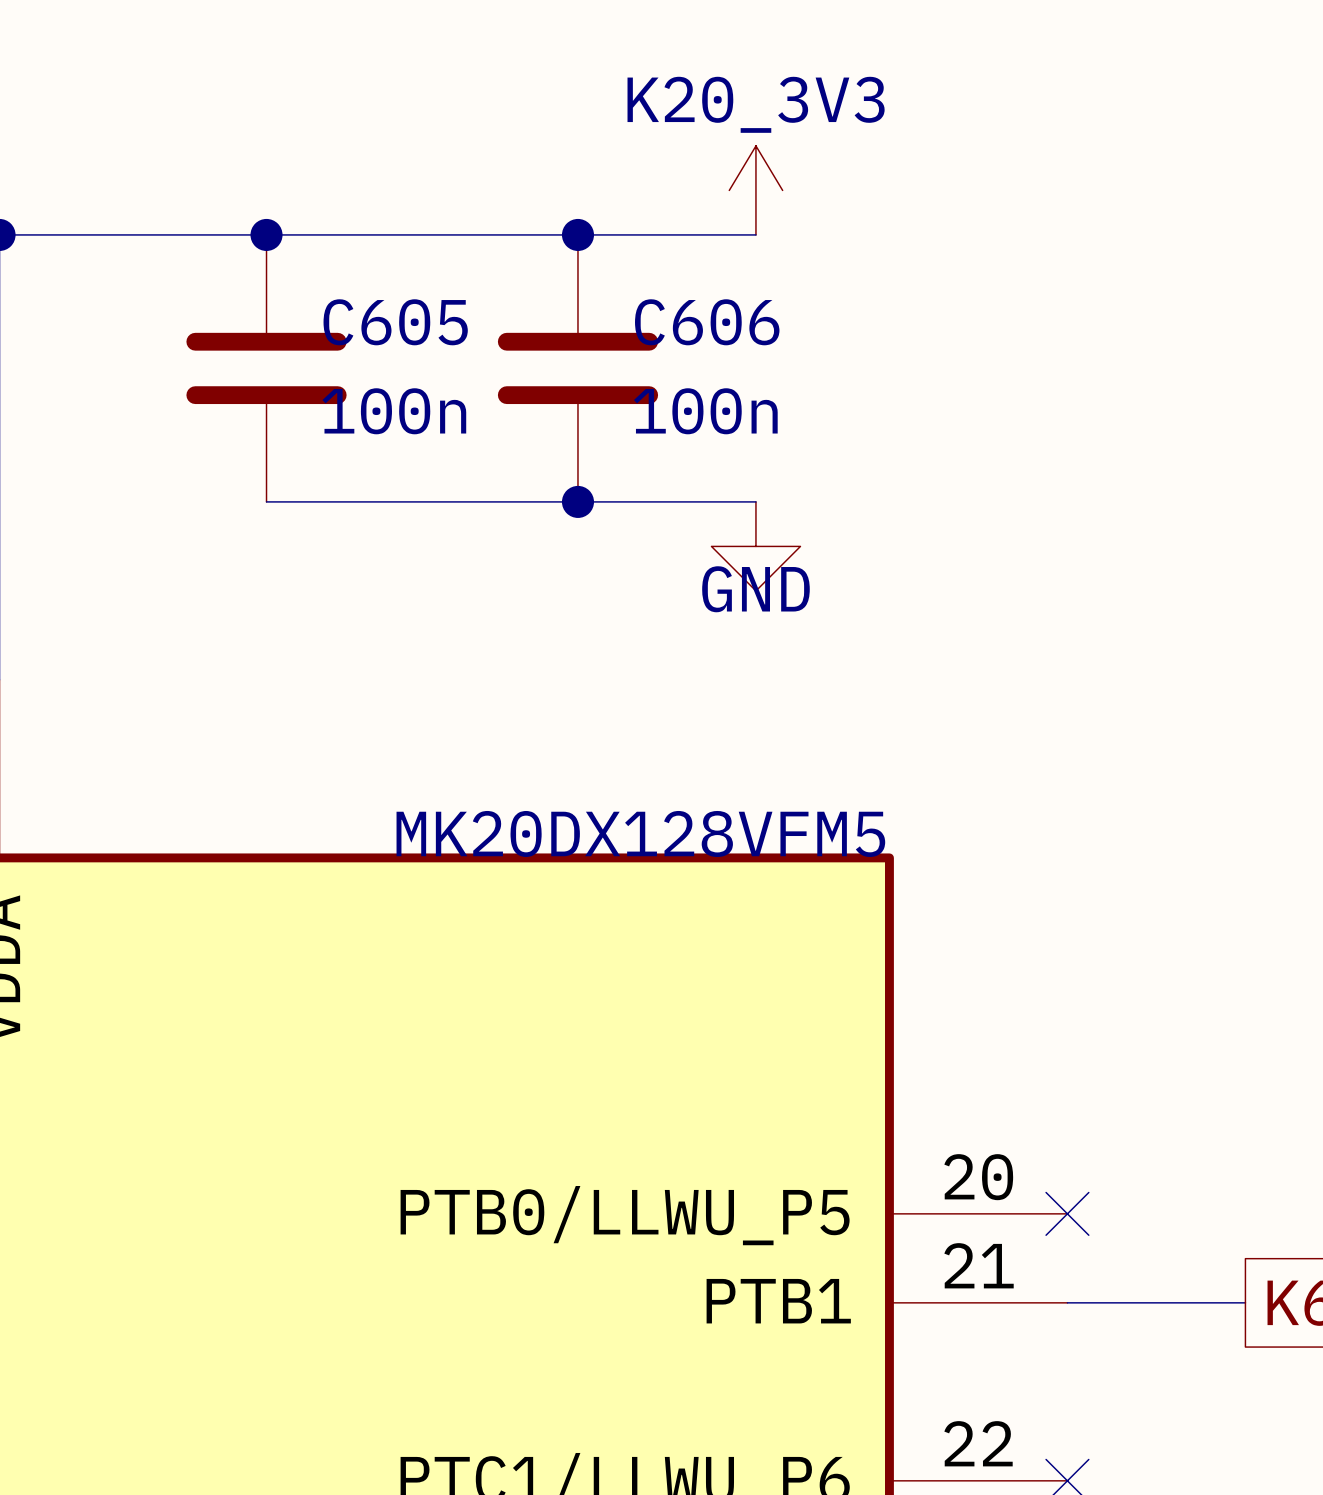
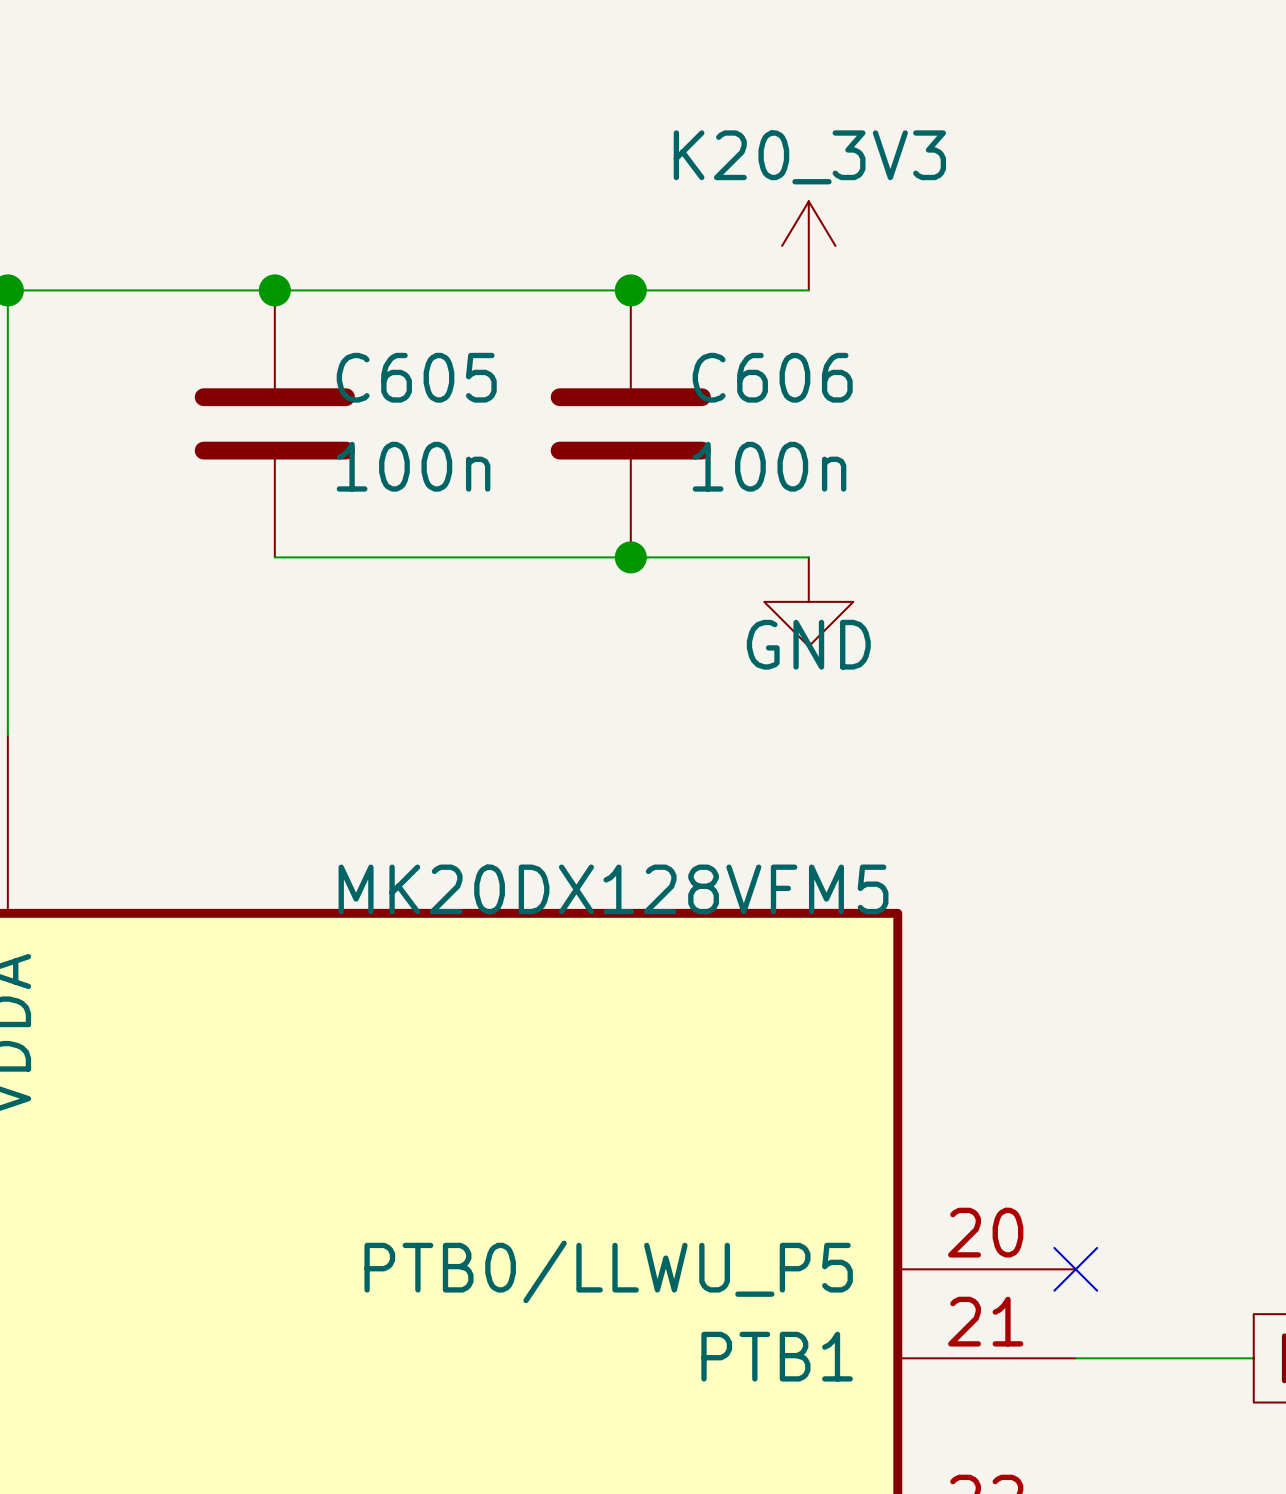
power symbol position: K20_3V3 (755, 190) -> K20_3V3 (808, 245)
junction position: (577, 234) -> (630, 290)
wire: none -> (764, 290) (808, 290)
C606 position: (577, 368) -> (630, 423)
junction position: (577, 501) -> (630, 557)
wire: none -> (764, 557) (808, 557)
power symbol position: GND (755, 546) -> GND (808, 601)

